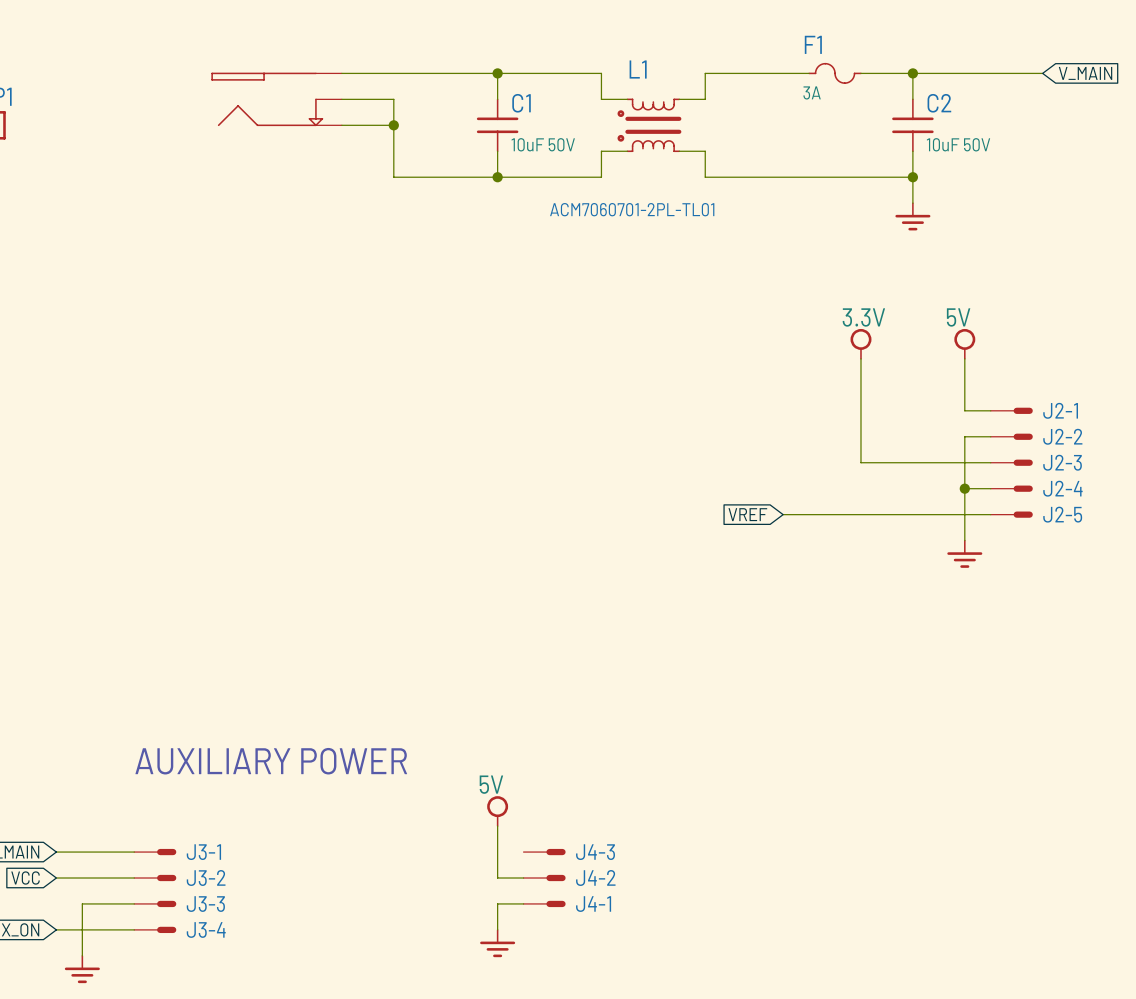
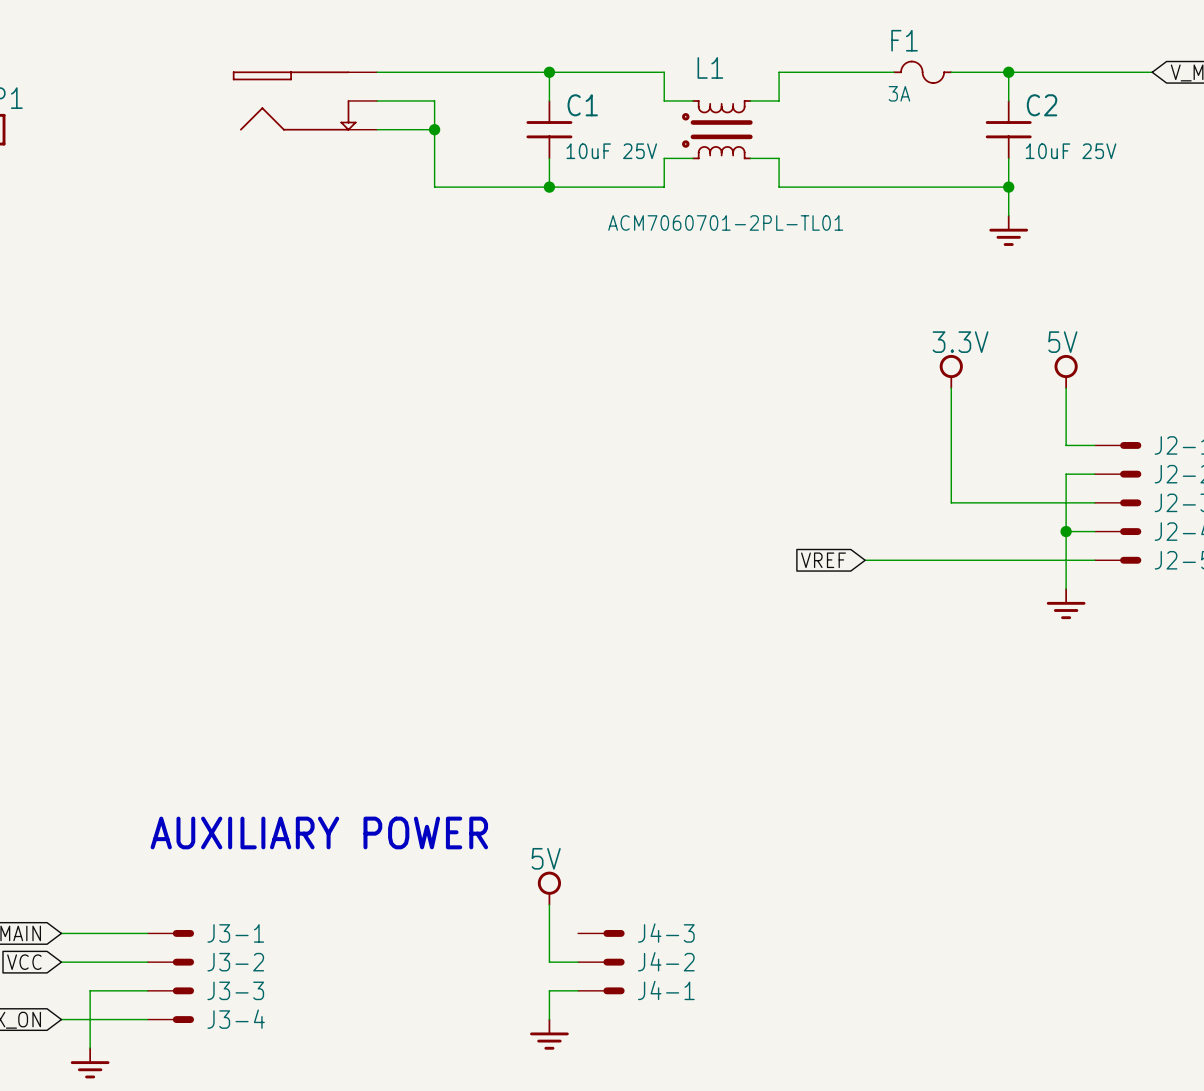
C1 value: 10uF 50V (543, 144) -> 10uF 25V (611, 151)
C2 value: 10uF 50V (958, 144) -> 10uF 25V (1071, 151)

